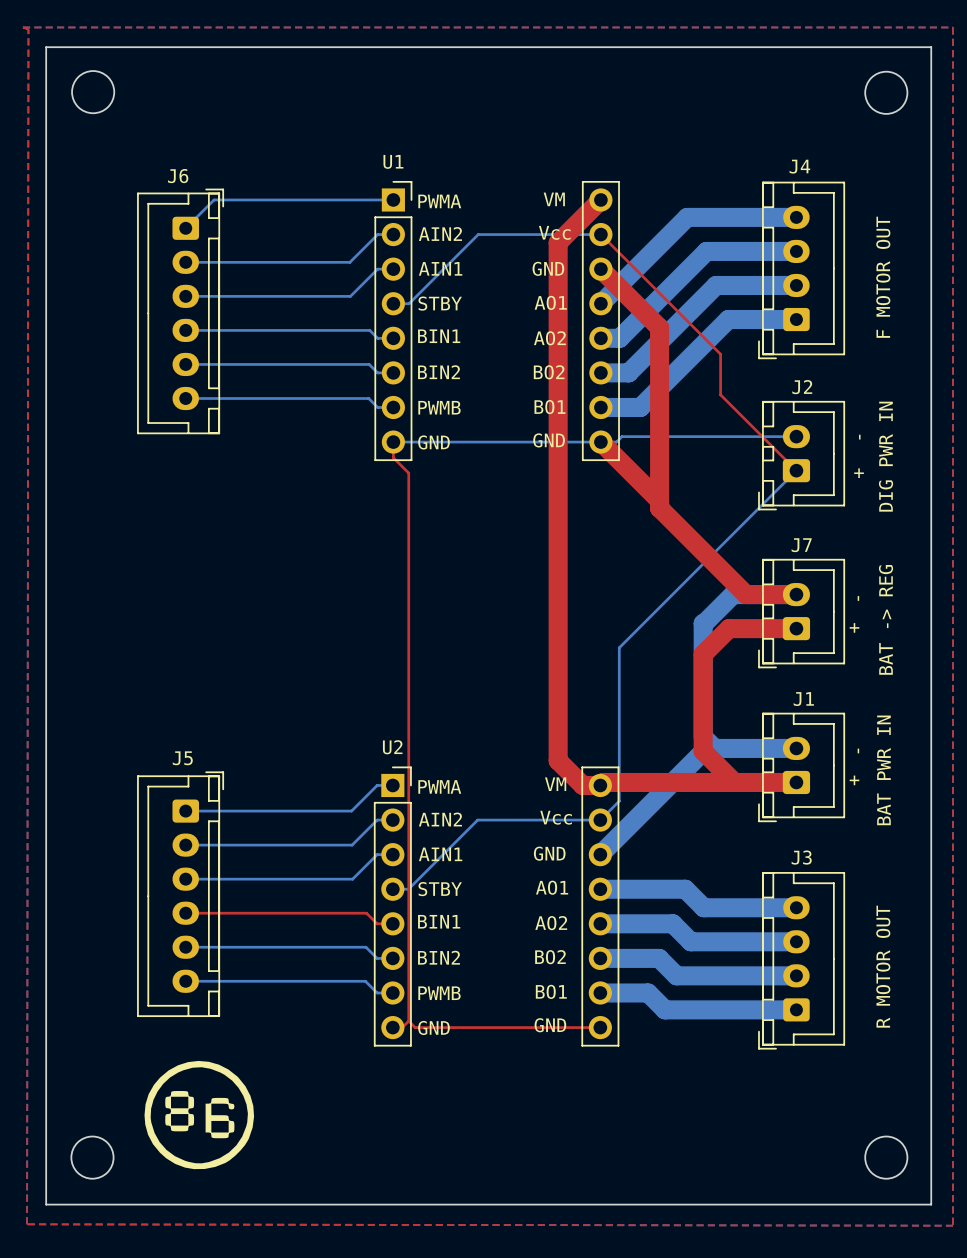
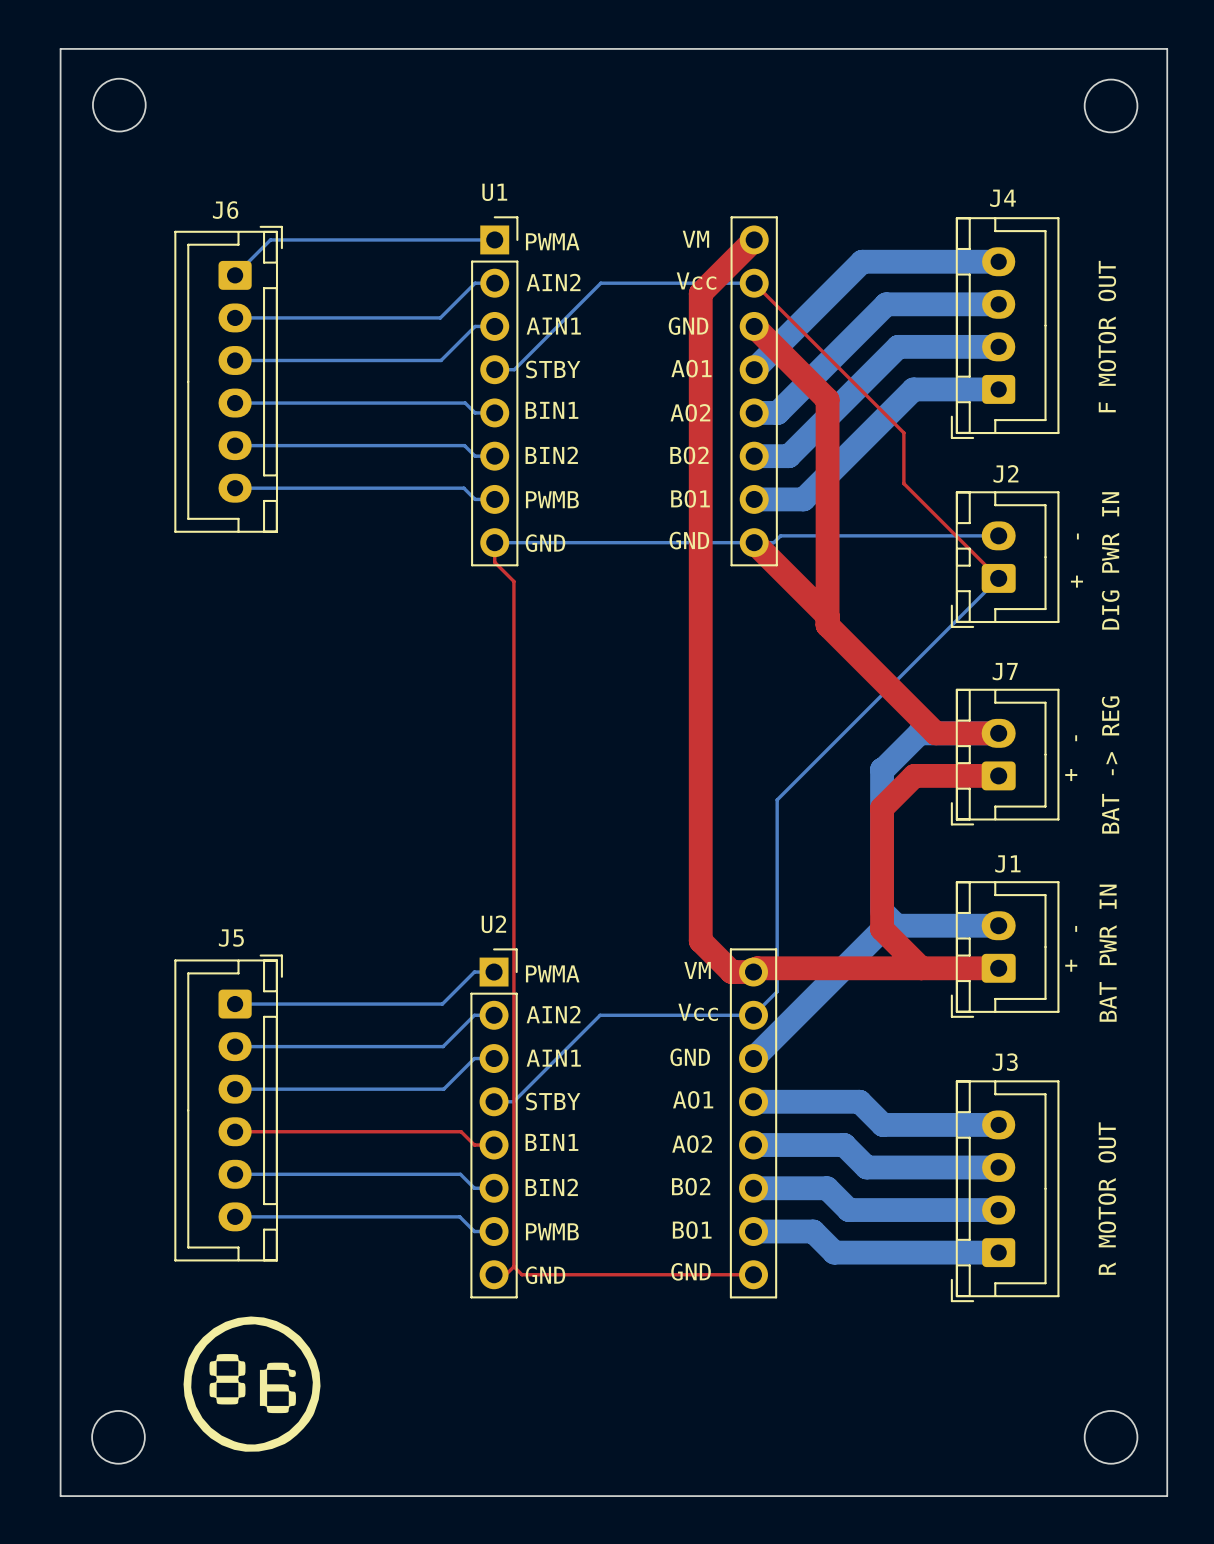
top zone outline: (23, 27) (953, 27) (953, 1225) (27, 1224) (28, 29) (23, 27) -> none

